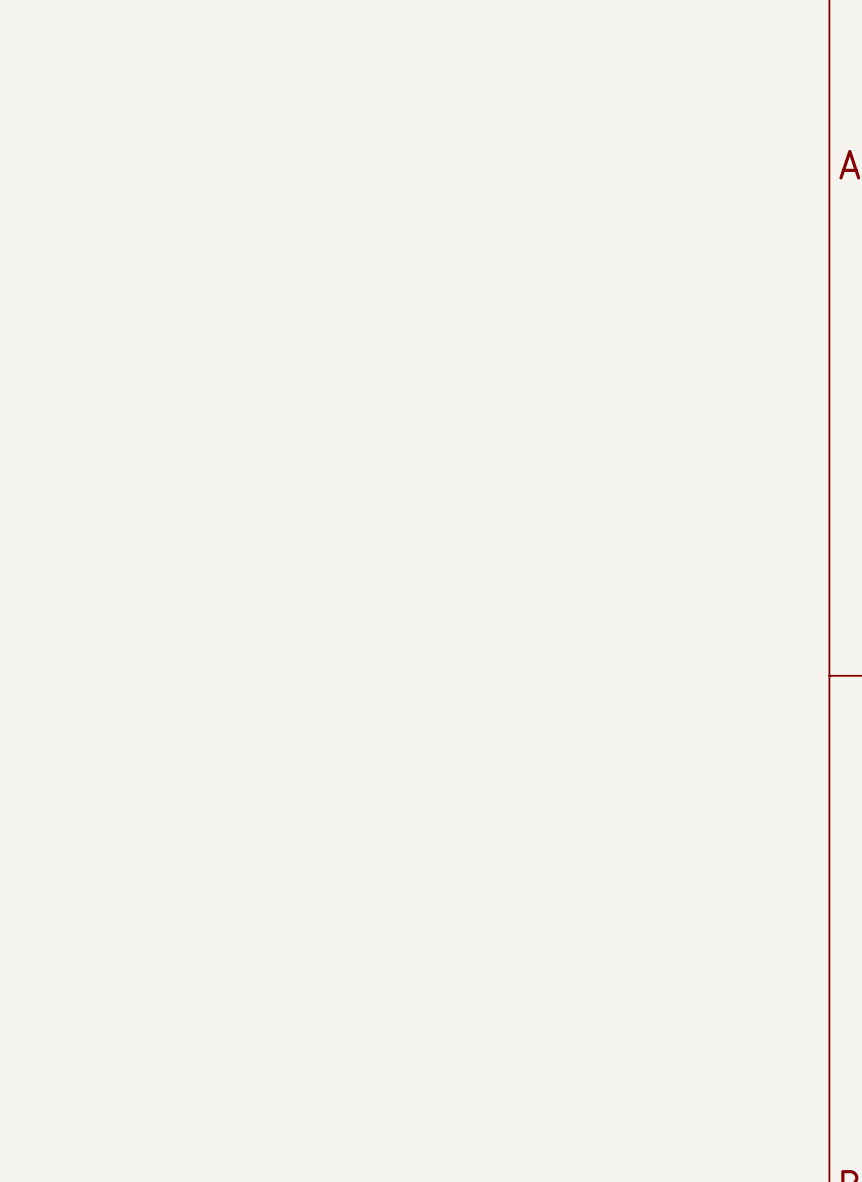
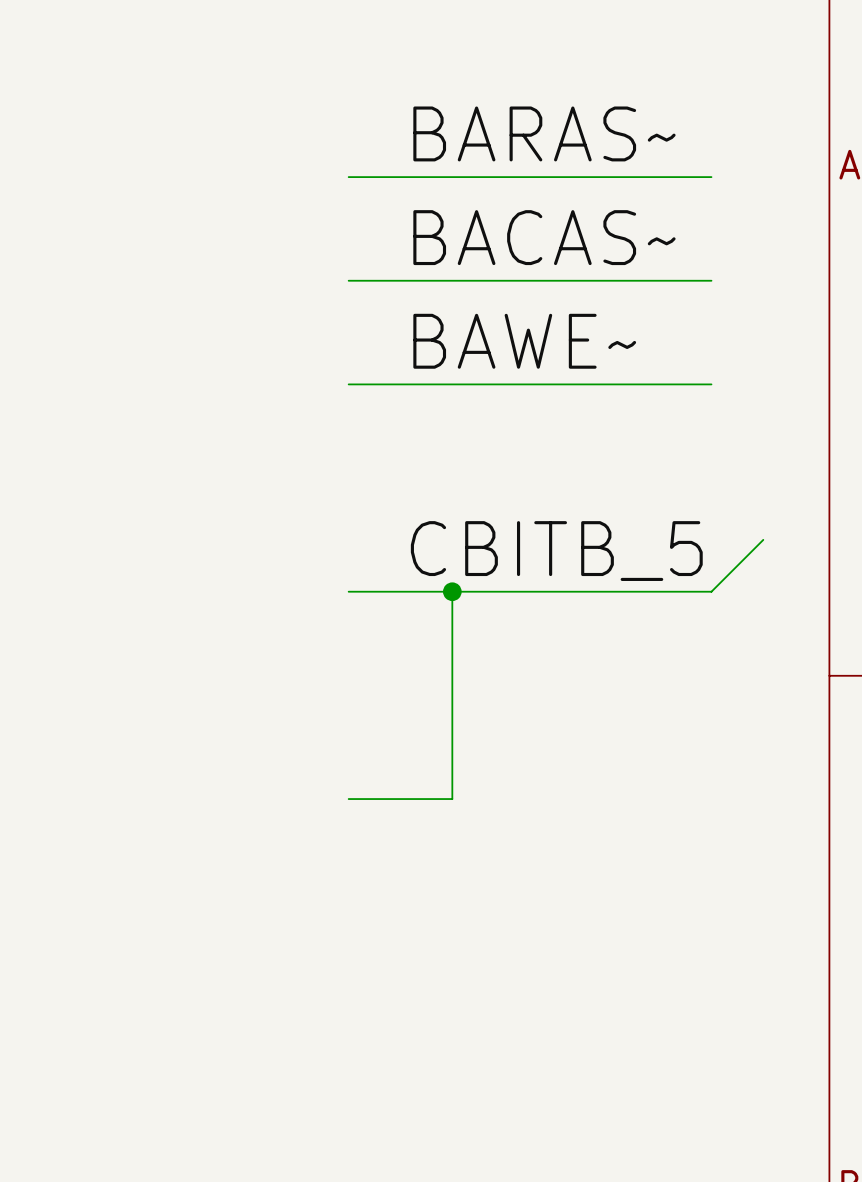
label: none -> BARAS~ (544, 133)
wire: none -> (348, 177) (711, 177)
label: none -> BACAS~ (544, 237)
wire: none -> (348, 280) (711, 280)
label: none -> BAWE~ (524, 341)
wire: none -> (348, 384) (711, 384)
wire: none -> (763, 539) (711, 591) (348, 591)
label: none -> CBITB_5 (556, 551)
wire: none -> (452, 591) (452, 799) (348, 799)
junction: none -> (452, 591)

